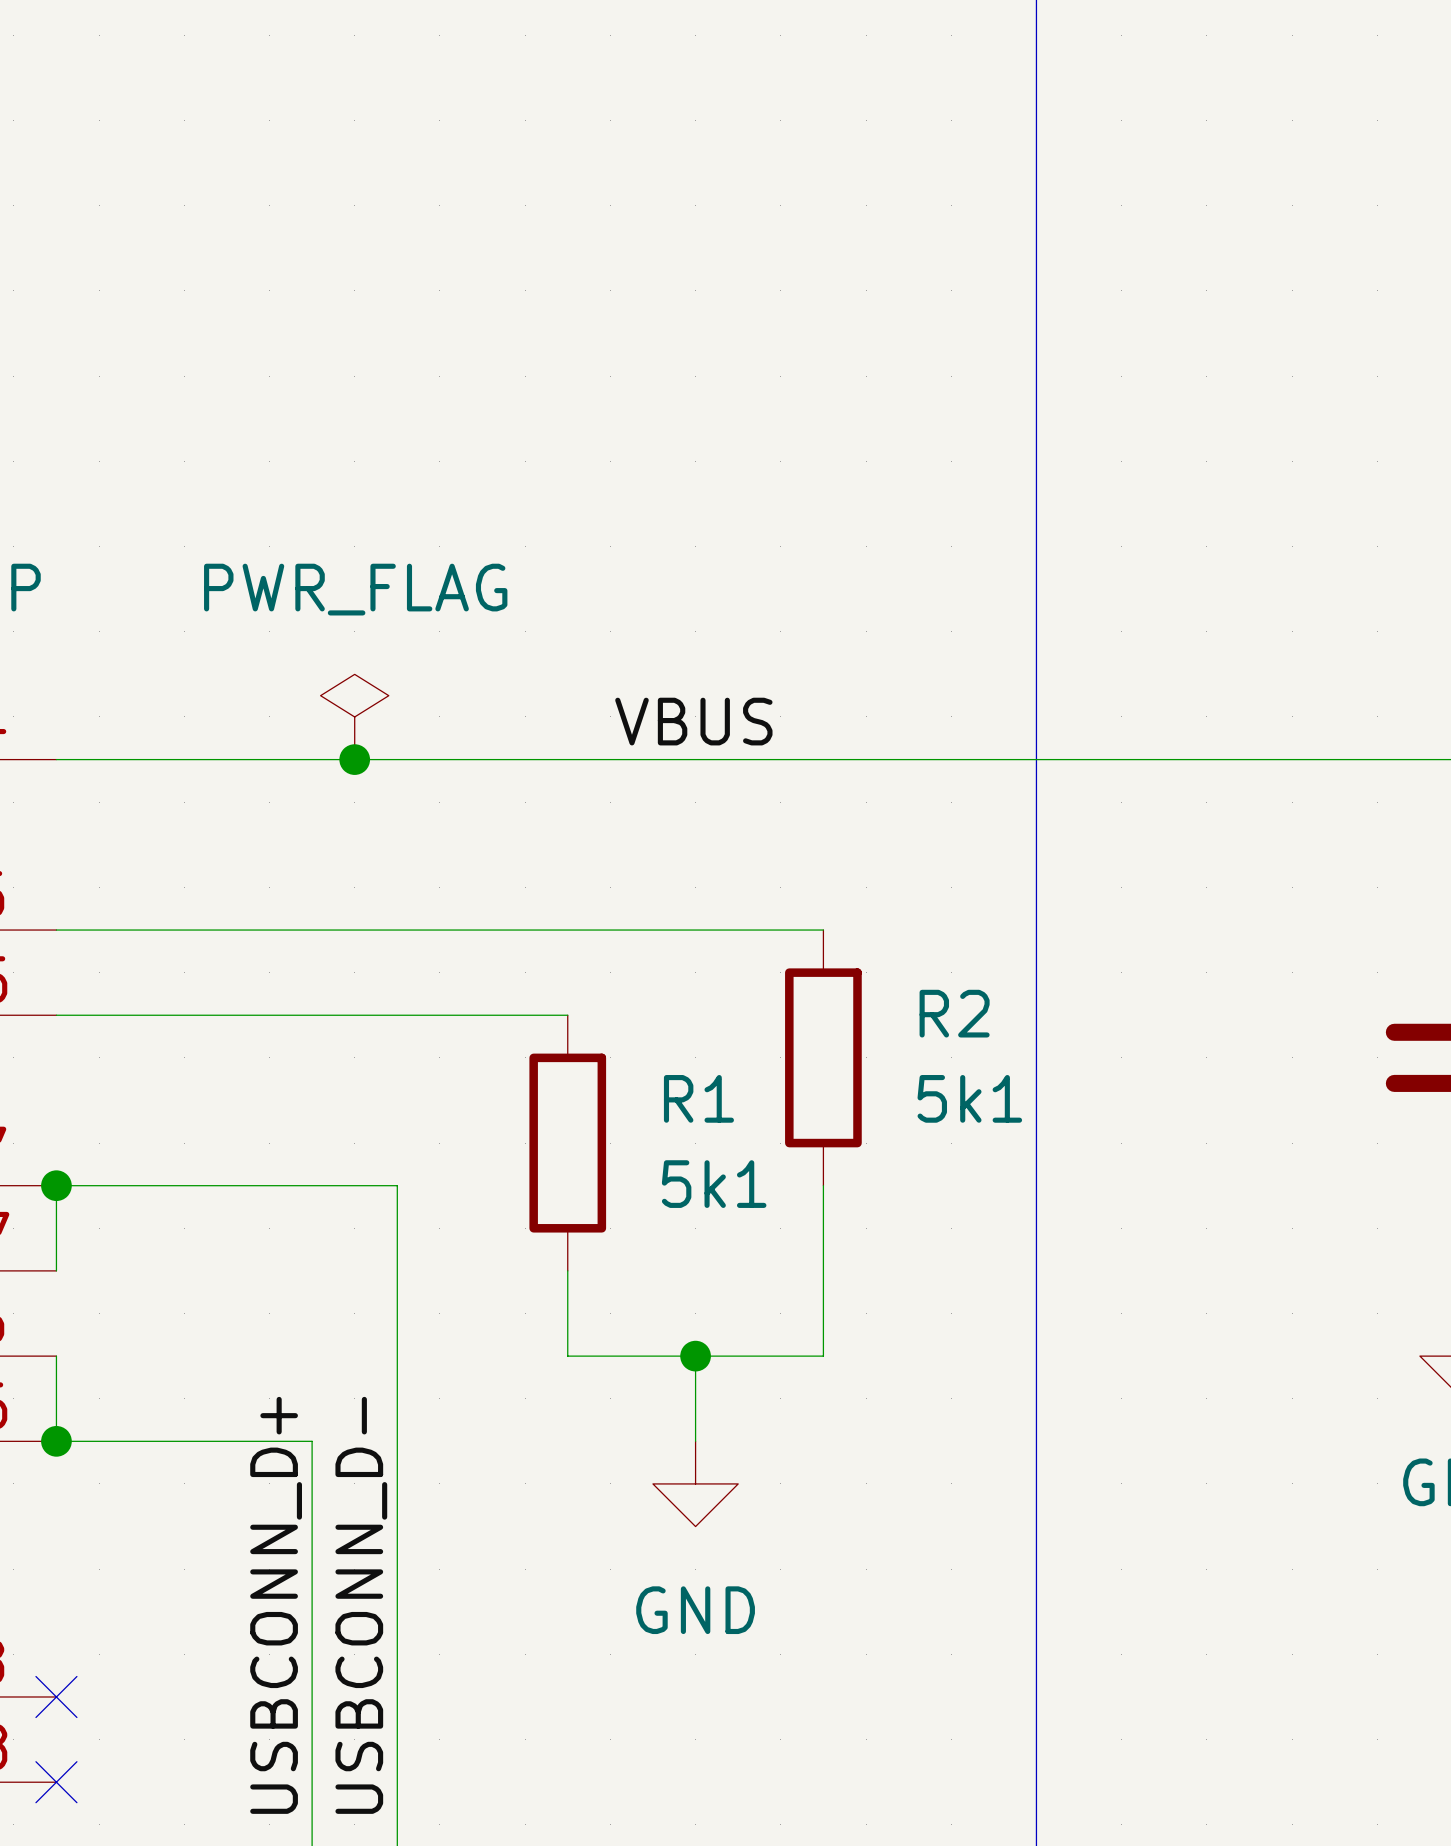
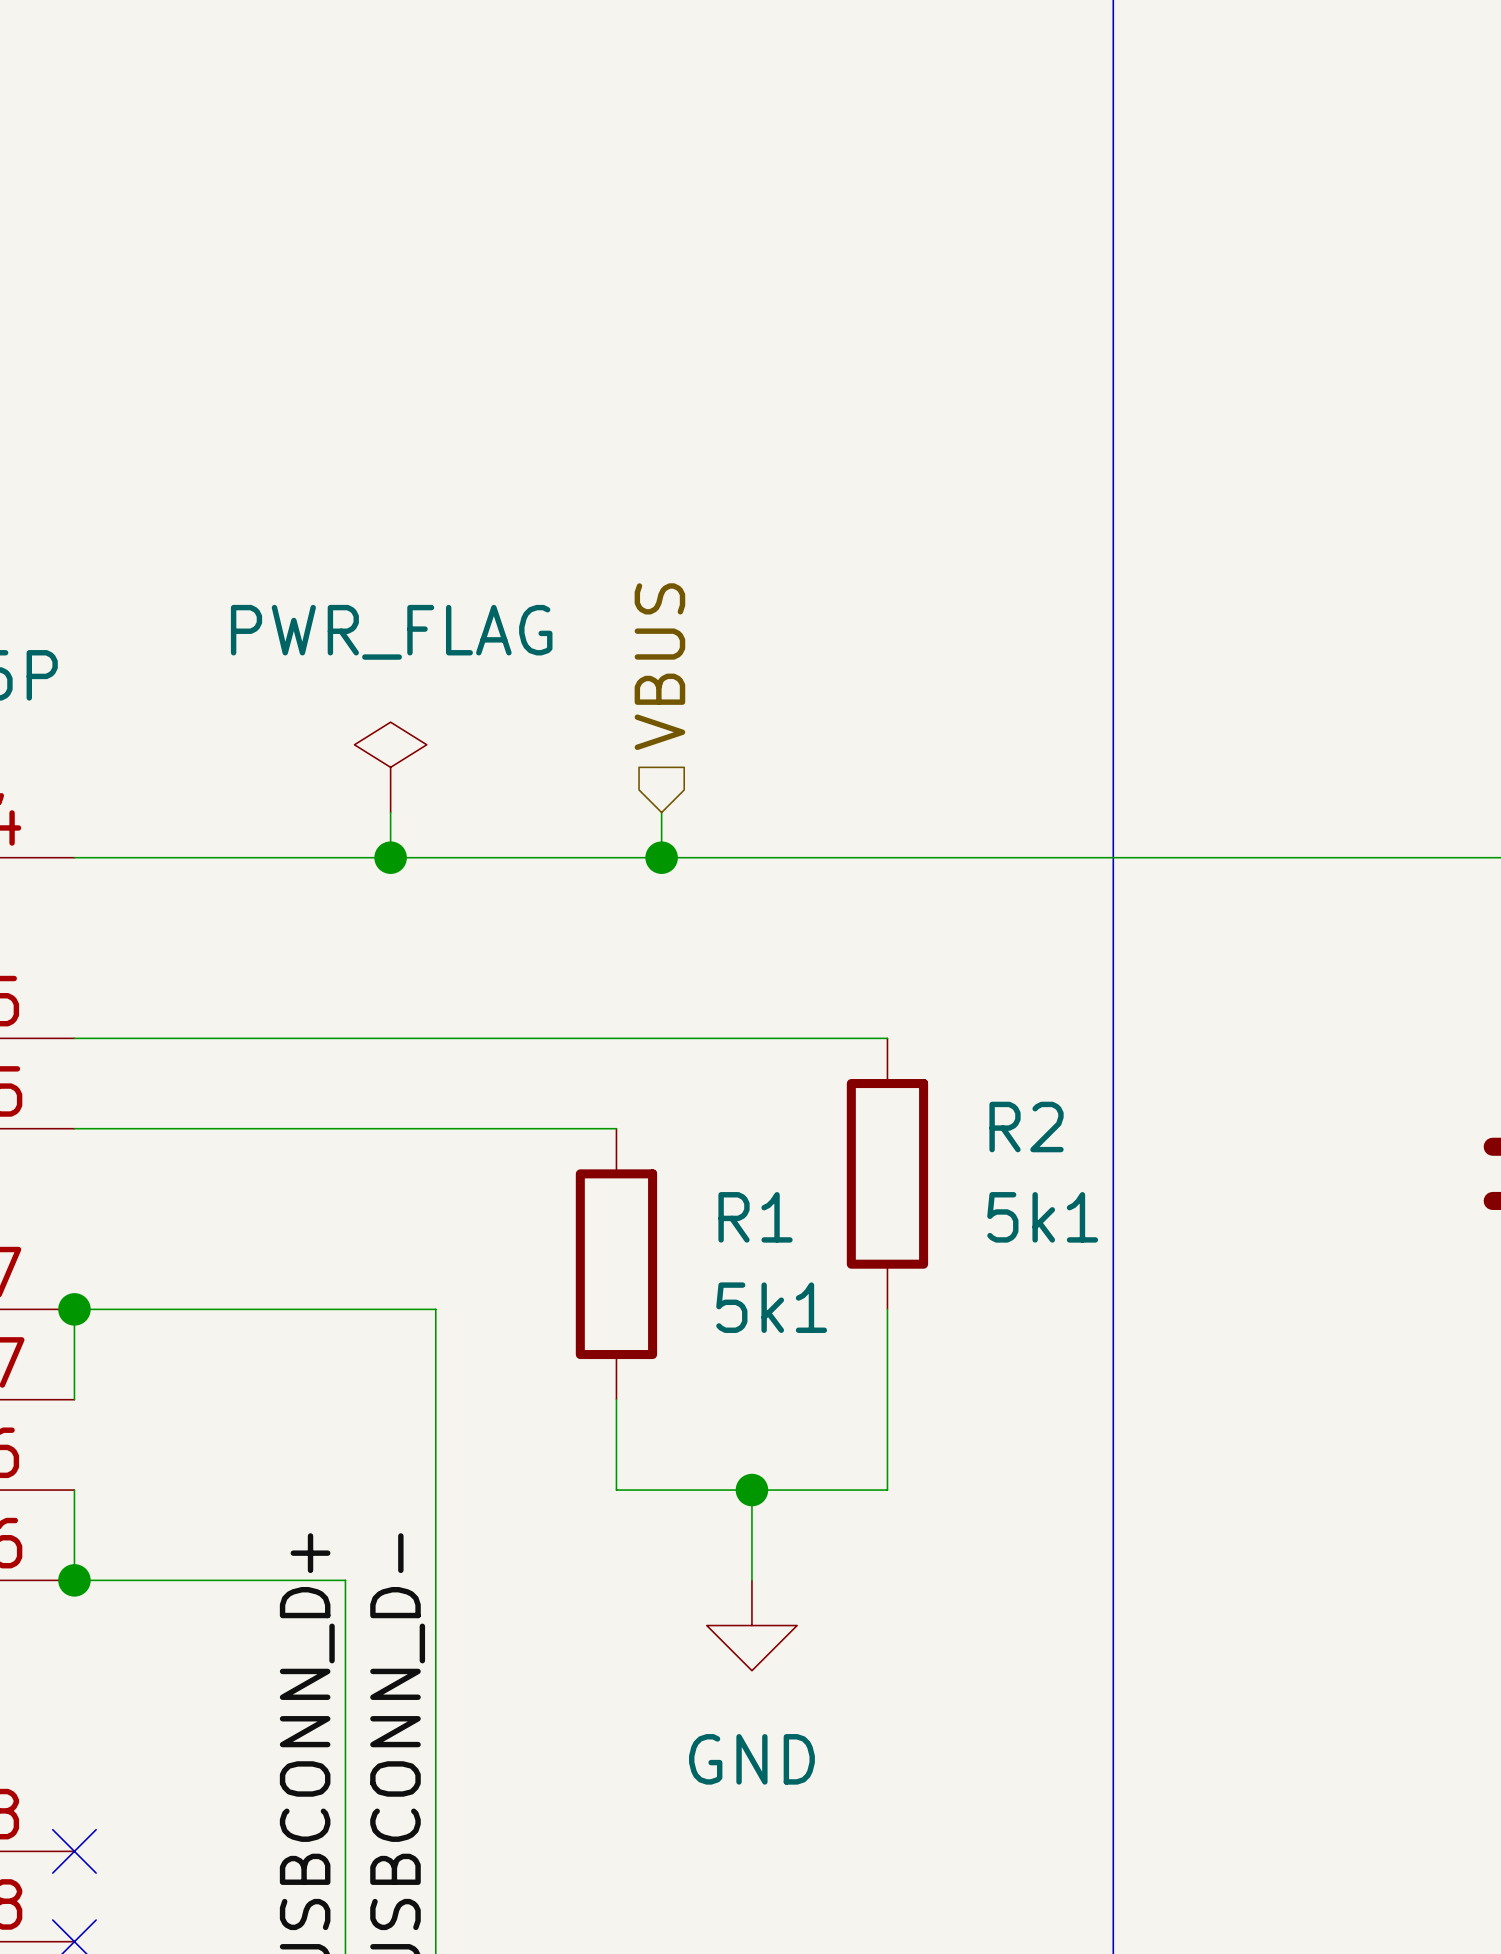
hierarchical label: none -> VBUS (659, 666)
power symbol position: PWR_FLAG (354, 716) -> PWR_FLAG (390, 767)
wire: none -> (661, 812) (661, 857)
label: VBUS (693, 721) -> none
junction: none -> (661, 857)

